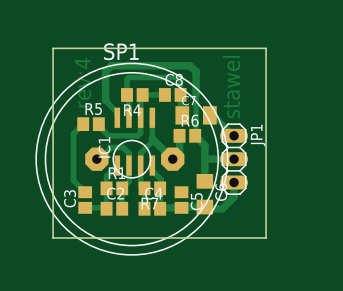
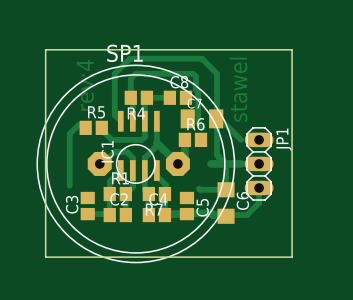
board edge: (53, 48) (53, 237) (266, 237) (266, 48) -> (54, 49) (45, 49) (45, 257) (292, 257) (292, 49) (274, 49)
track: (126, 79) (128, 77) (178, 77) (180, 79) (180, 114) (182, 115) -> (130, 81) (130, 78) (135, 73) (192, 73) (195, 76) (195, 89) (198, 91) (198, 123) (202, 127)
track: (117, 117) (117, 112) (105, 100) (105, 71) (111, 65) (190, 65) (196, 71) (195, 135) (204, 145) (204, 181) -> (120, 121) (114, 115) (114, 73) (129, 58) (201, 58) (217, 73) (217, 154) (226, 164) (226, 189) (198, 188)
track: none -> (79, 124) (69, 133) (69, 185)
track: (83, 124) (73, 133) (73, 180) (85, 192) -> none
JP1 position: (234, 159) -> (259, 163)
track: (234, 182) (234, 197) (222, 208) -> (259, 187) (259, 203) (247, 215) (229, 215)
C6 position: (204, 194) -> (226, 203)

